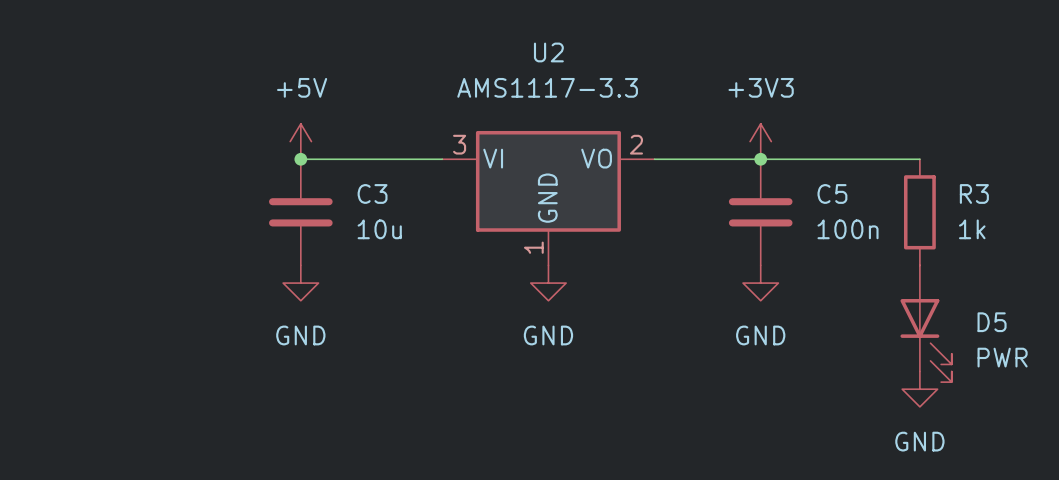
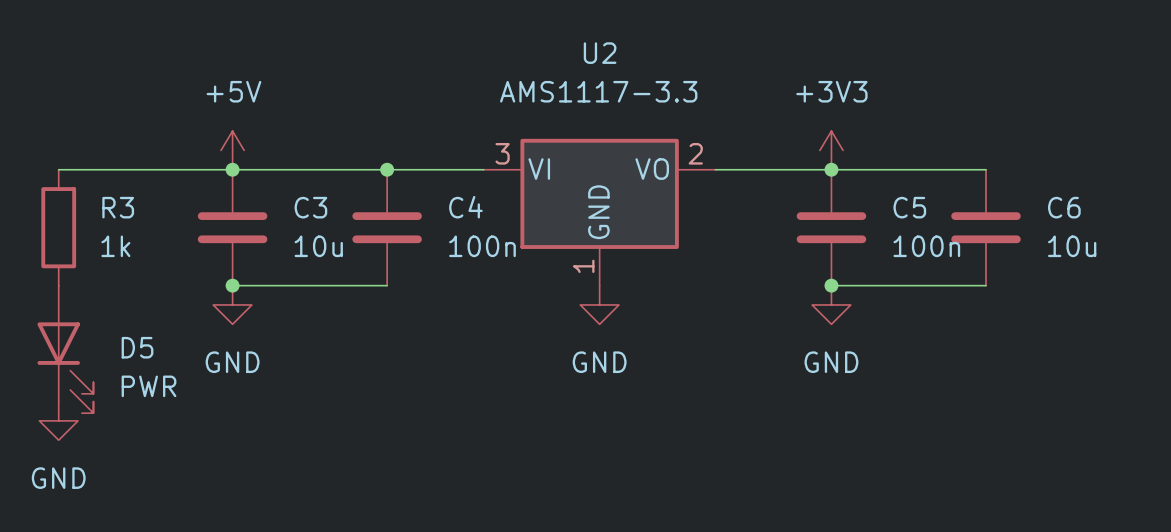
power symbol position: +5V (300, 141) -> +5V (232, 150)
wire: none -> (58, 169) (329, 169)
junction: none -> (232, 169)
junction: (300, 159) -> none
junction: none -> (387, 169)
wire: (902, 159) (919, 159) -> none
C3 position: (300, 212) -> (232, 227)
C4: none -> 100n (387, 227)
C6: none -> 10u (986, 227)
R3 position: (919, 212) -> (58, 227)
wire: none -> (232, 285) (387, 285)
junction: none -> (232, 285)
wire: none -> (831, 285) (986, 285)
junction: none -> (831, 285)
power symbol position: GND (300, 283) -> GND (232, 304)
D5 position: (926, 323) -> (65, 349)
power symbol: none -> GND (58, 420)
power symbol: GND (919, 389) -> none

